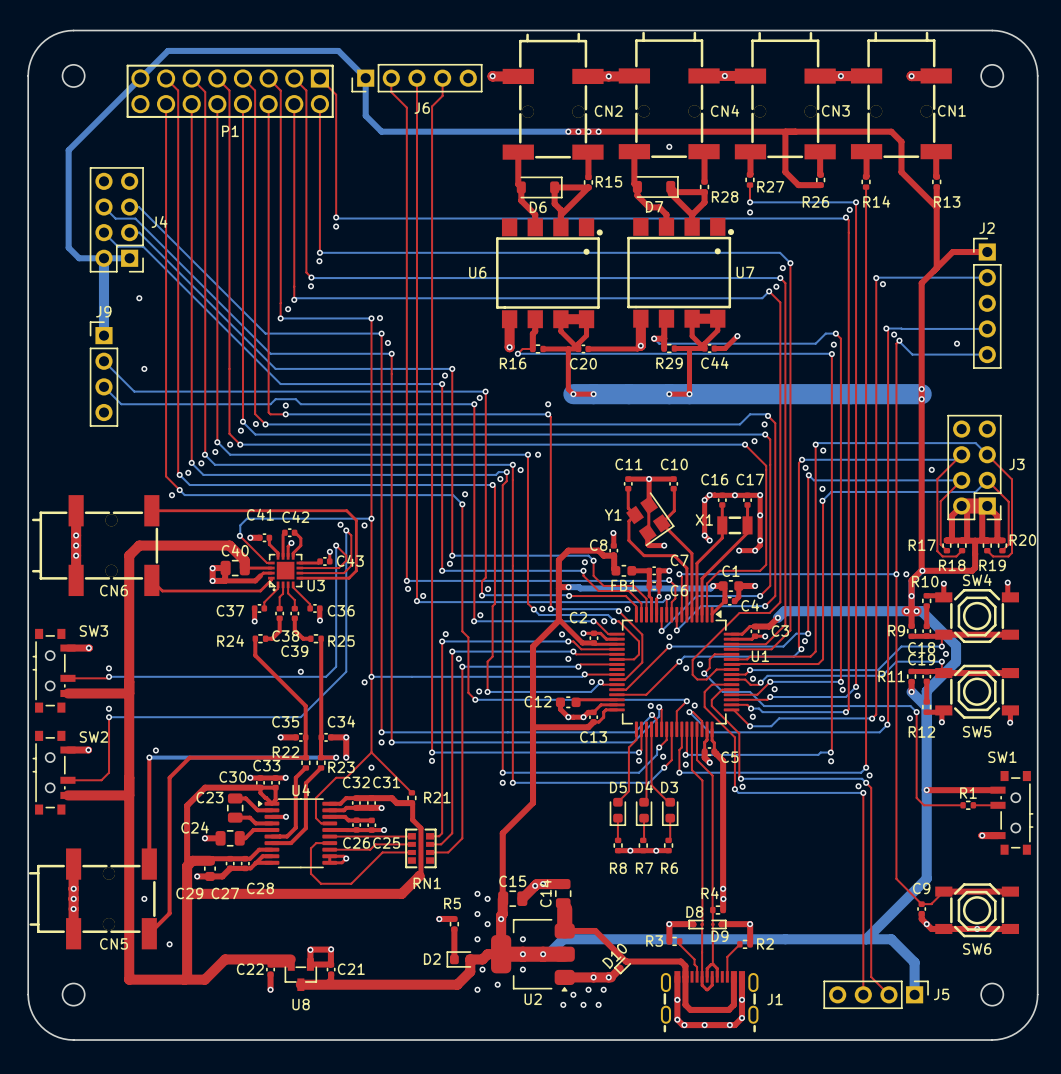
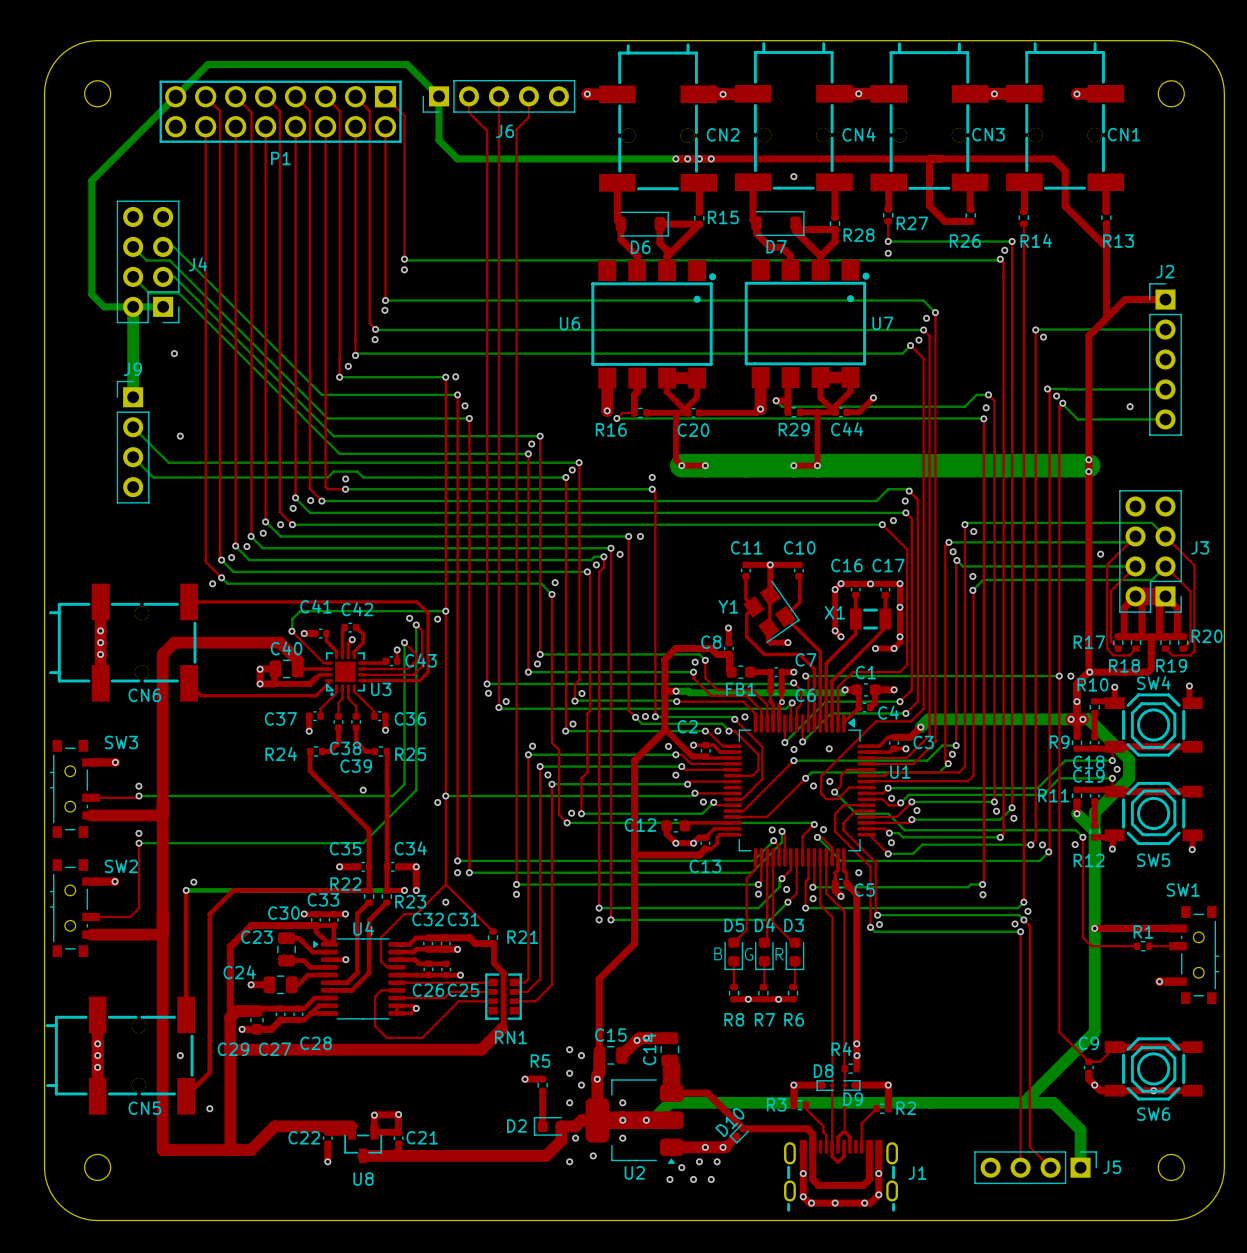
via: none -> (829, 748)
via: none -> (858, 872)
text: none -> B (718, 953)
text: none -> G (749, 954)
text: none -> R (779, 954)

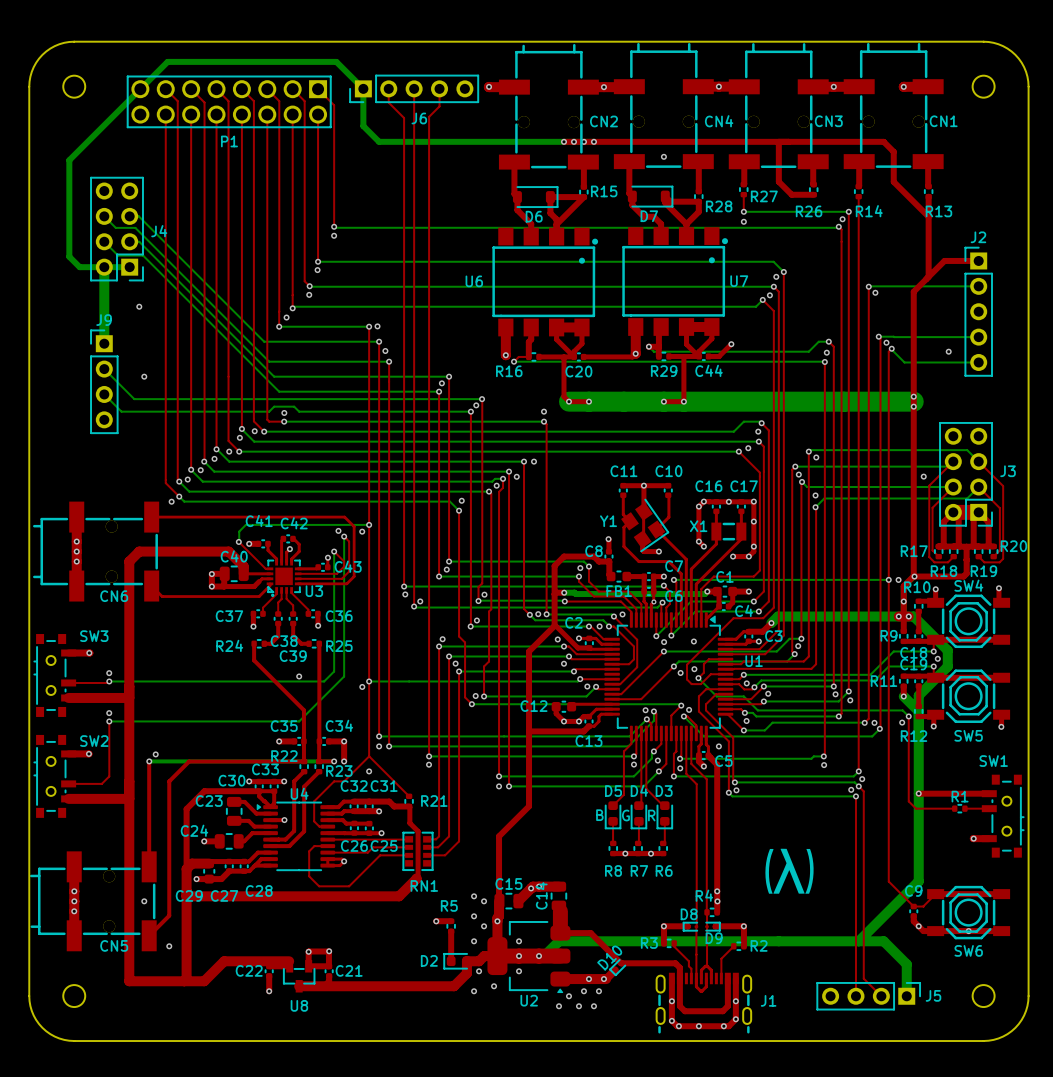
drawing: none -> [765, 848, 814, 894]

